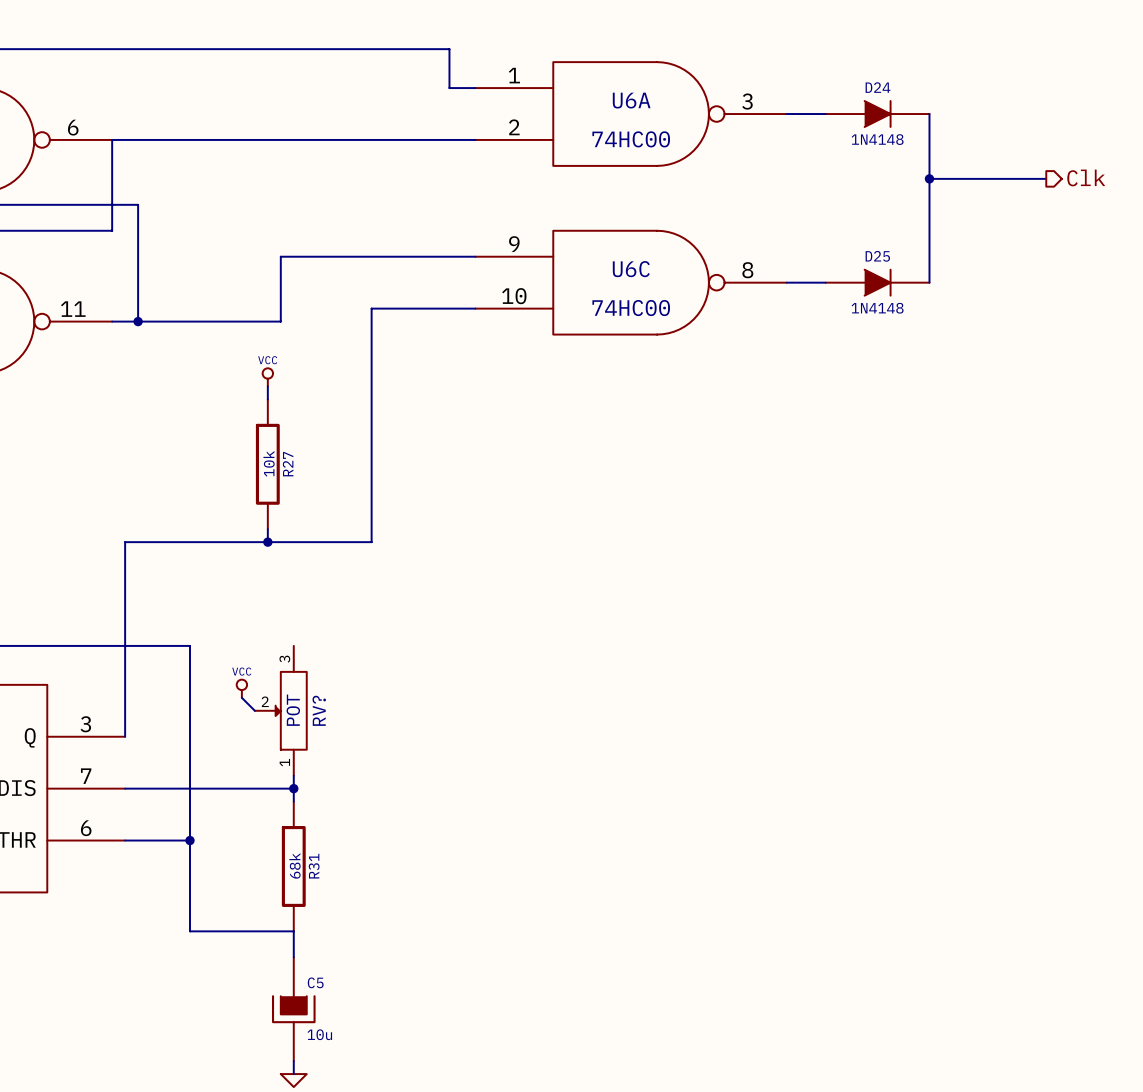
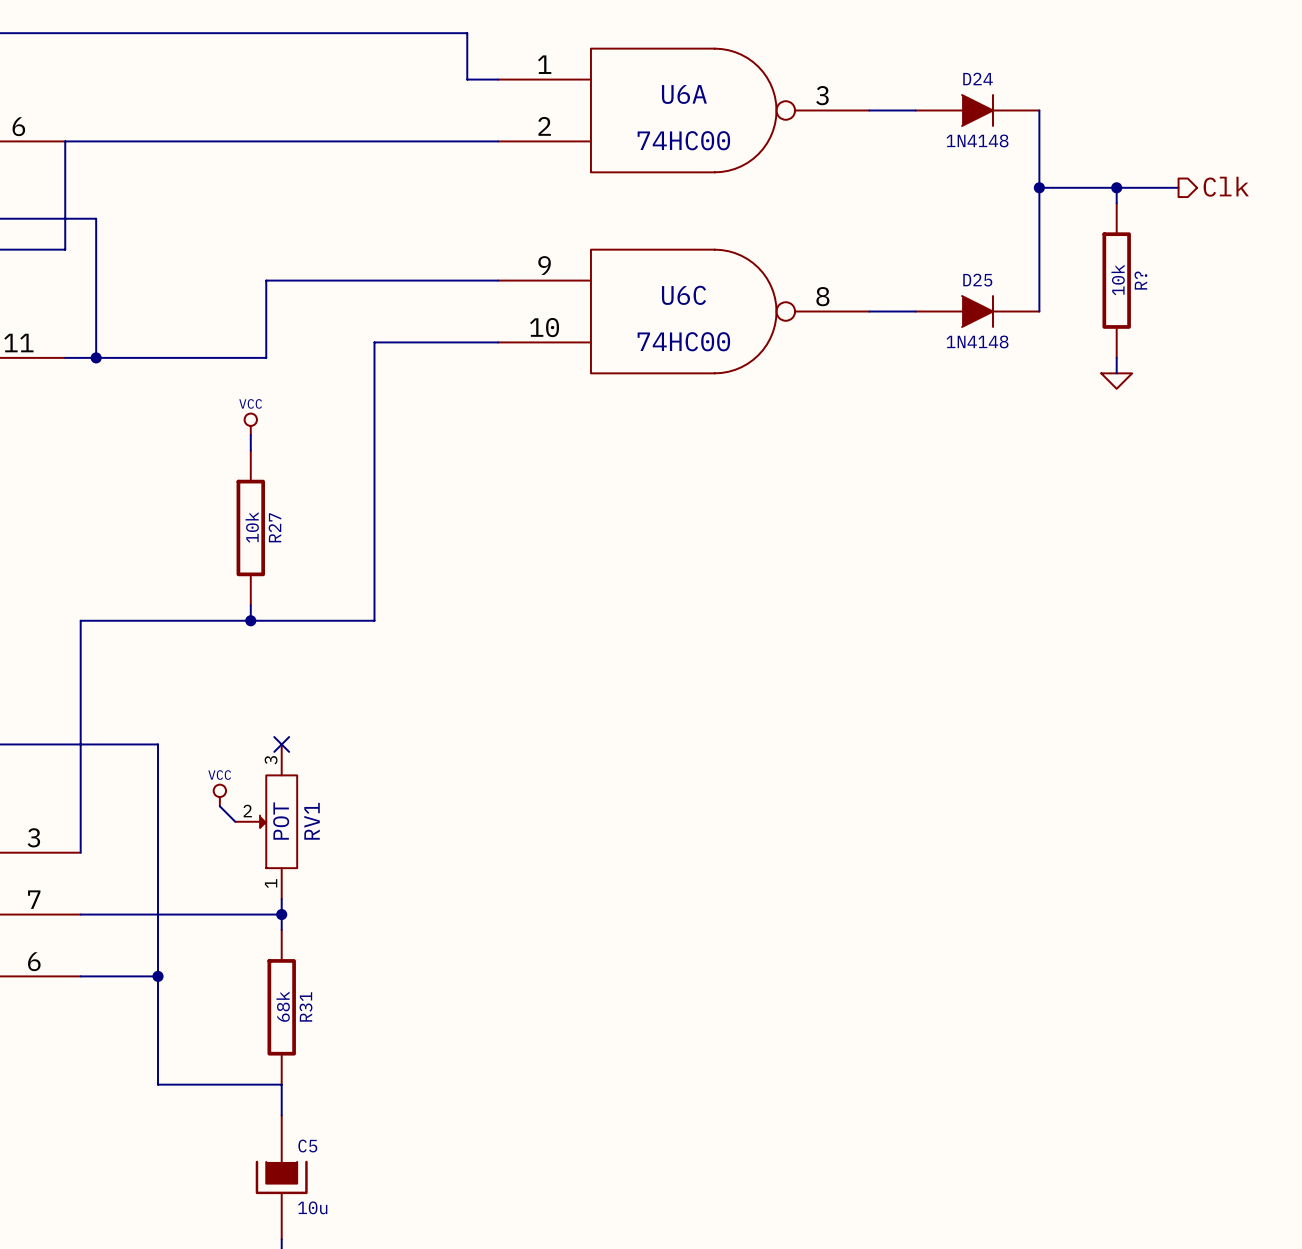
wire: none -> (1116, 187) (1116, 203)
junction: none -> (1116, 187)
R?: none -> 10k (1116, 280)
wire: none -> (1116, 357) (1116, 373)
power symbol: none -> (1116, 381)
no-connect mark: none -> (281, 744)
RV? name: RV? (319, 710) -> RV1 (312, 821)

